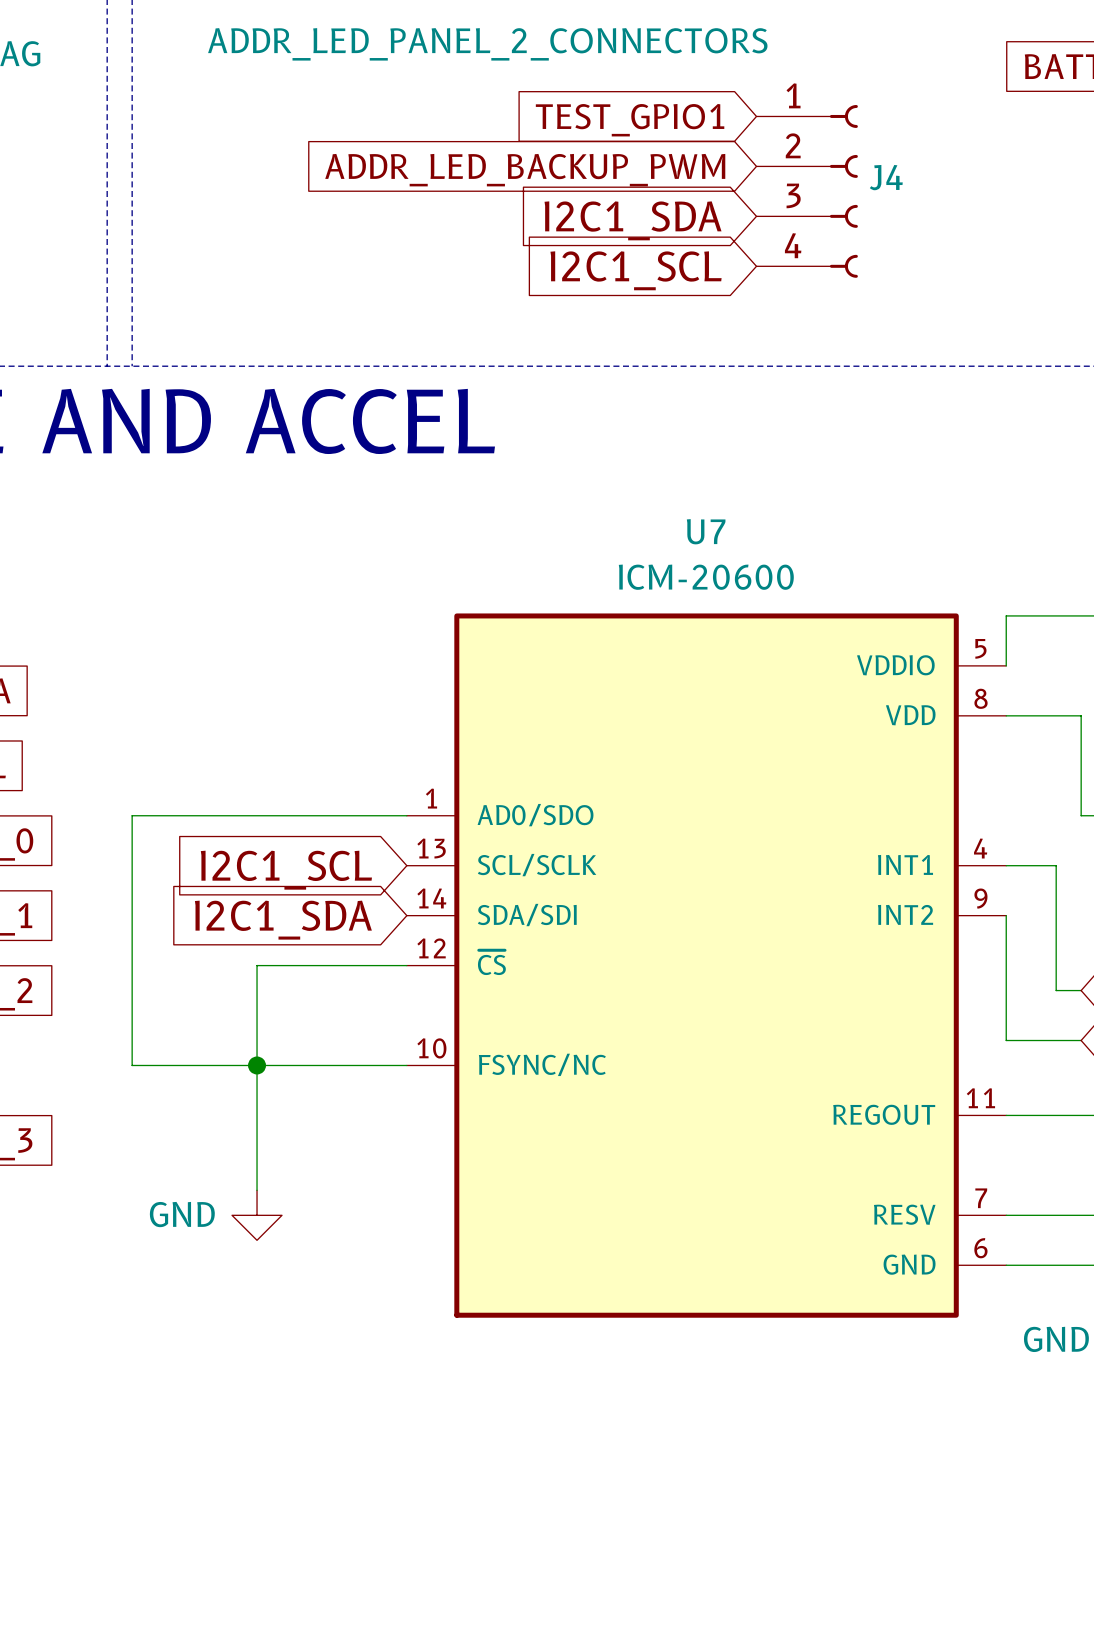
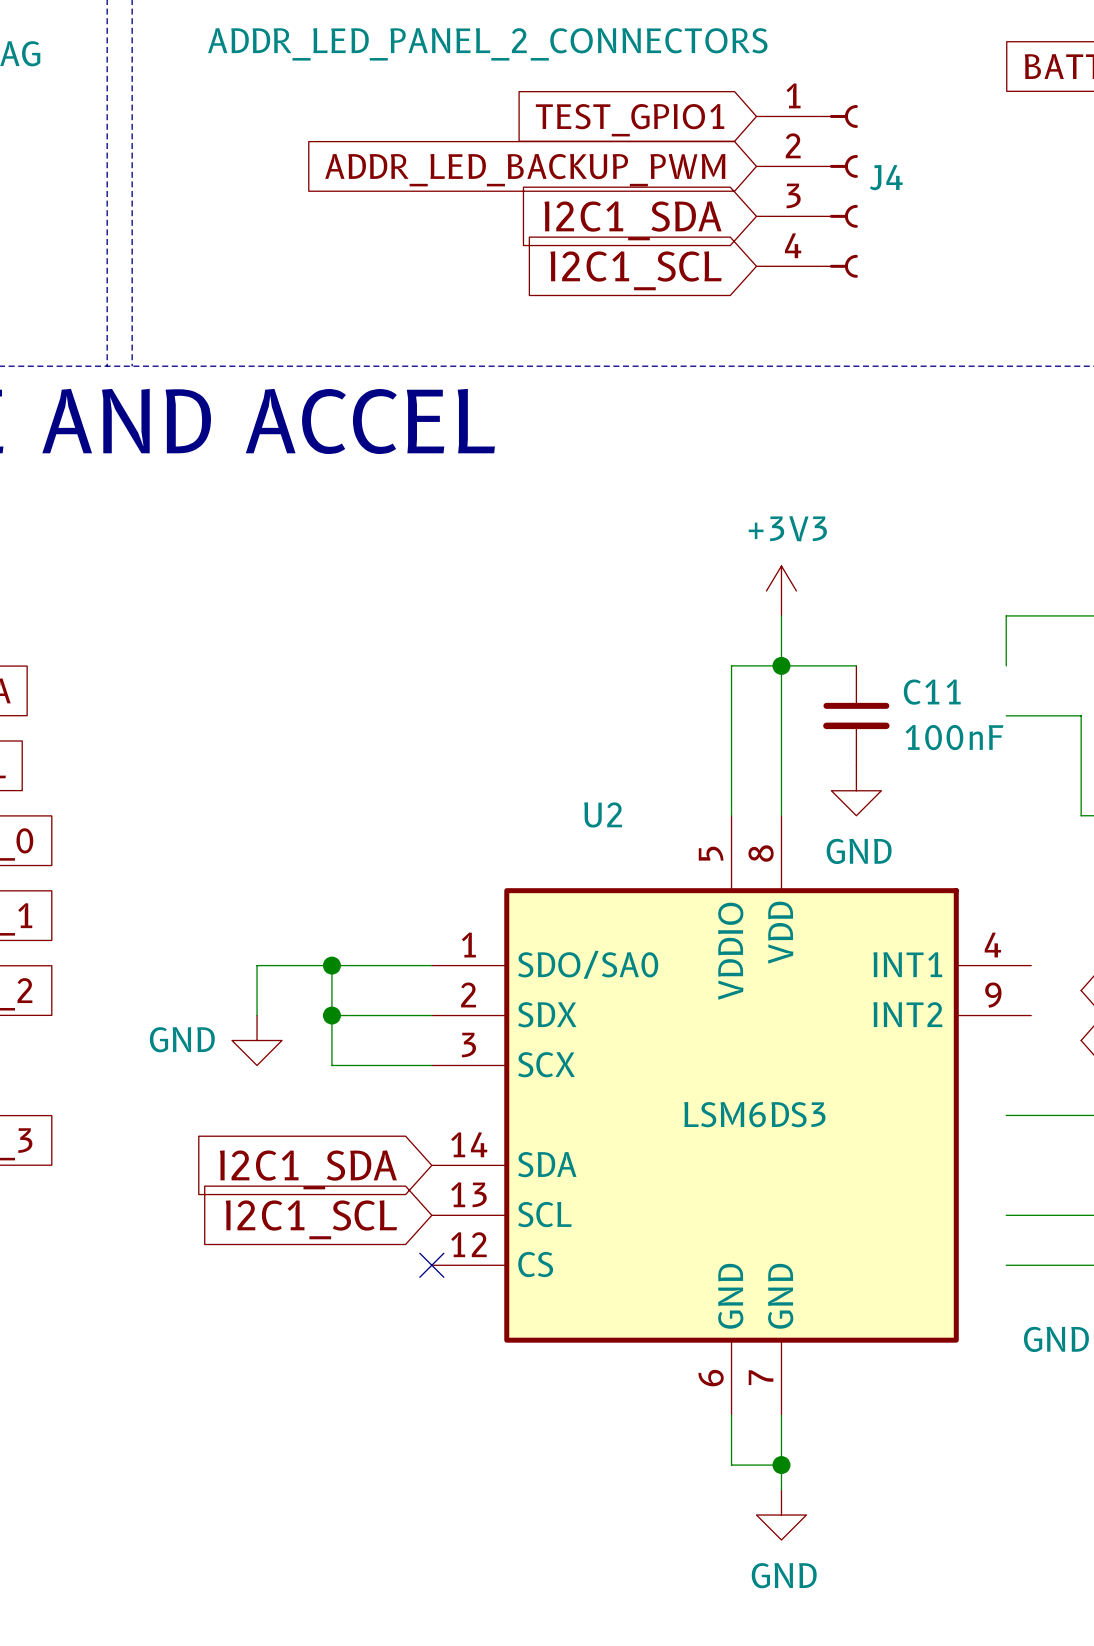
power symbol: none -> +3V3 (781, 590)
junction: none -> (781, 665)
C11: none -> 100nF (856, 715)
power symbol: none -> GND (856, 790)
wire: (406, 815) (132, 815) (132, 1065) (331, 1065) -> (331, 965) (331, 1065)
wire: (1006, 865) (1056, 865) (1056, 990) (1081, 990) -> none
global label position: I2C1_SCL (286, 870) -> I2C1_SCL (311, 1219)
wire: (1006, 915) (1006, 1040) (1081, 1040) -> none
global label position: I2C1_SDA (283, 920) -> I2C1_SDA (308, 1169)
junction: none -> (331, 965)
U7: ICM-20600 (706, 965) -> none
wire: (257, 1015) (257, 1190) -> none
wire: none -> (331, 1015) (431, 1015)
junction: none -> (331, 1015)
junction: (257, 1065) -> none
U2: none -> LSM6DS3 (731, 1115)
power symbol position: GND (257, 1215) -> GND (257, 1040)
no-connect mark: none -> (431, 1265)
wire: none -> (731, 1415) (731, 1465) (781, 1465)
wire: none -> (781, 1415) (781, 1490)
junction: none -> (781, 1465)
power symbol: none -> GND (781, 1515)

